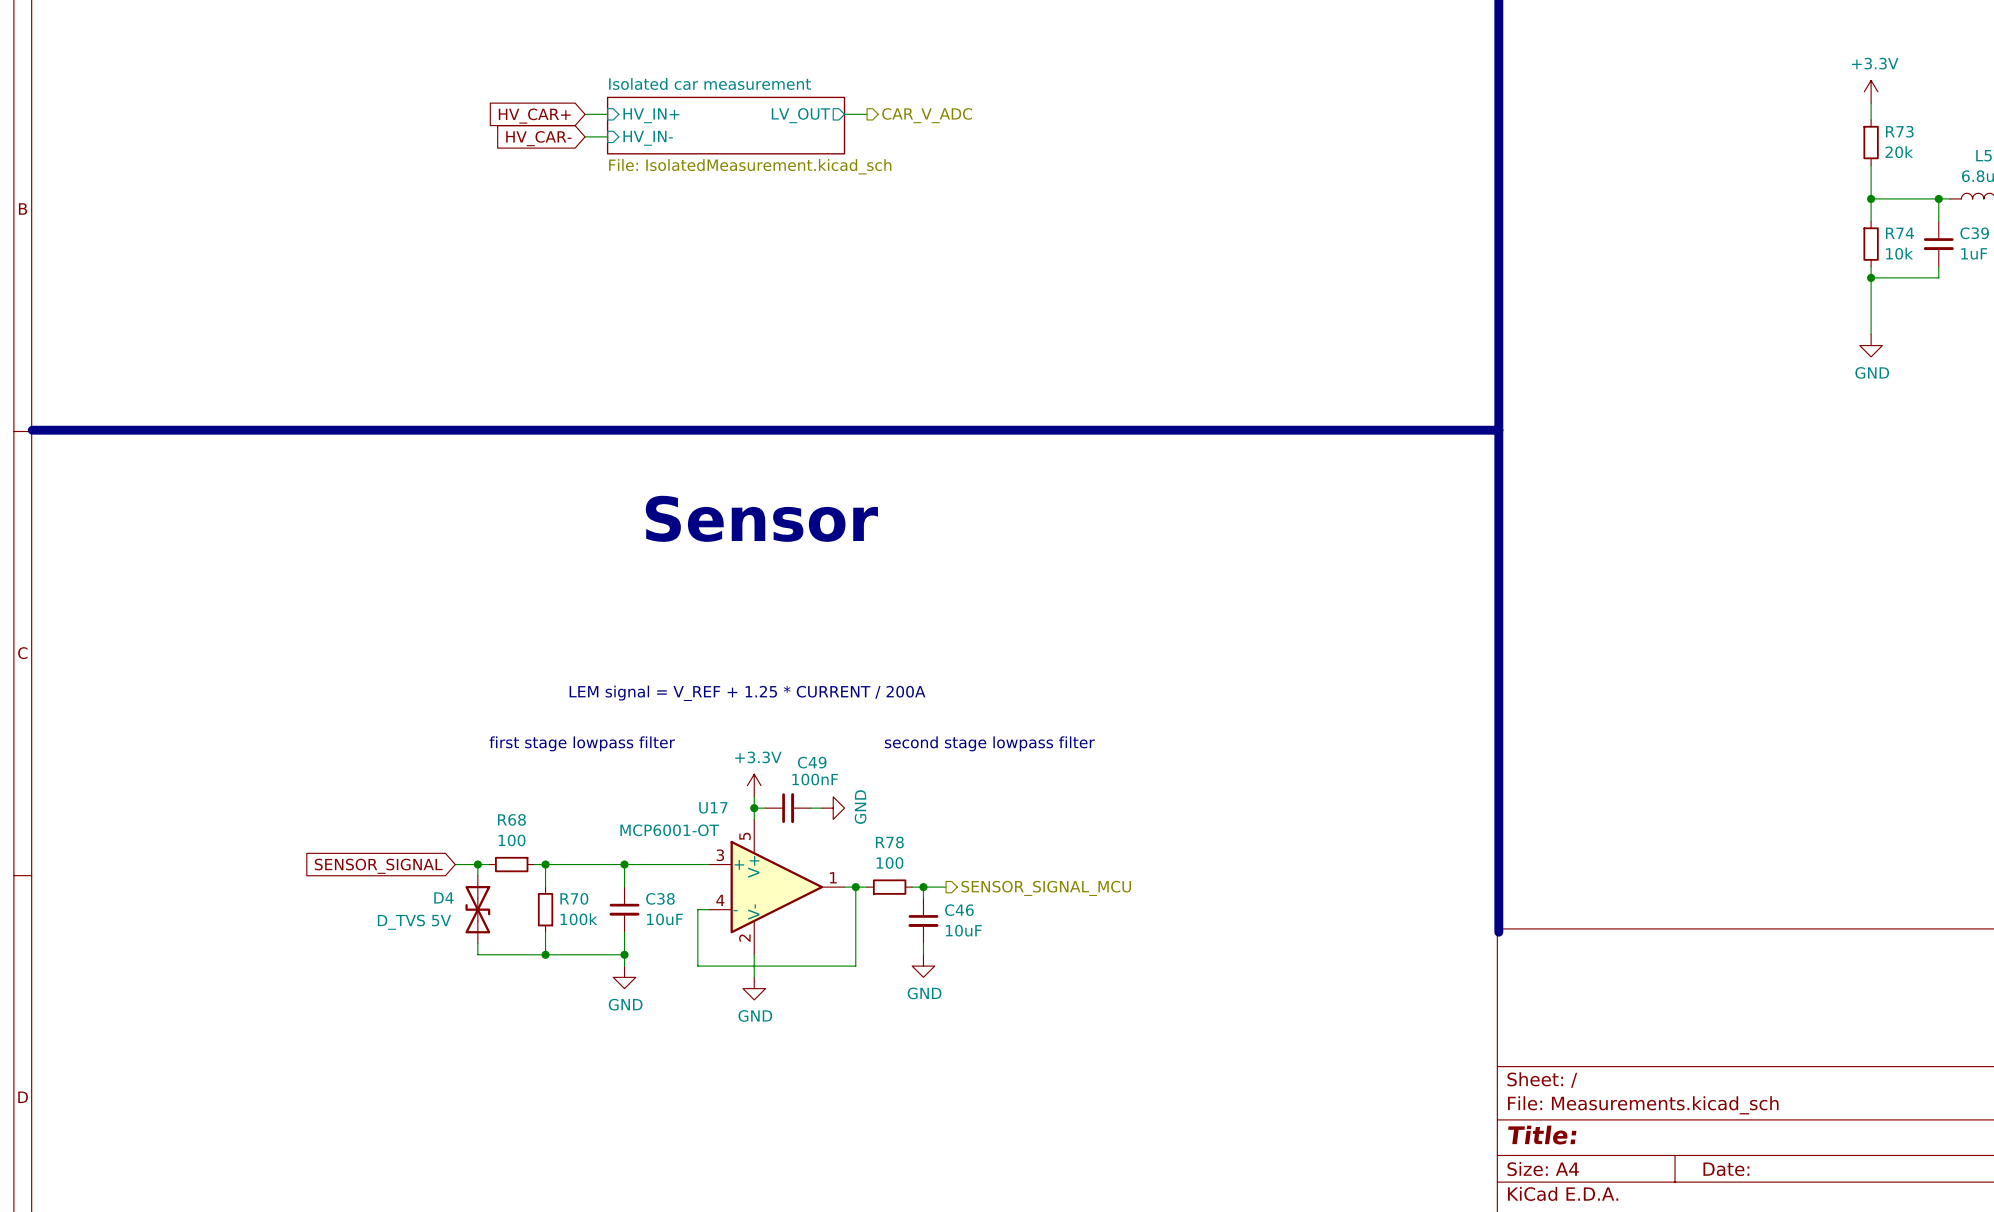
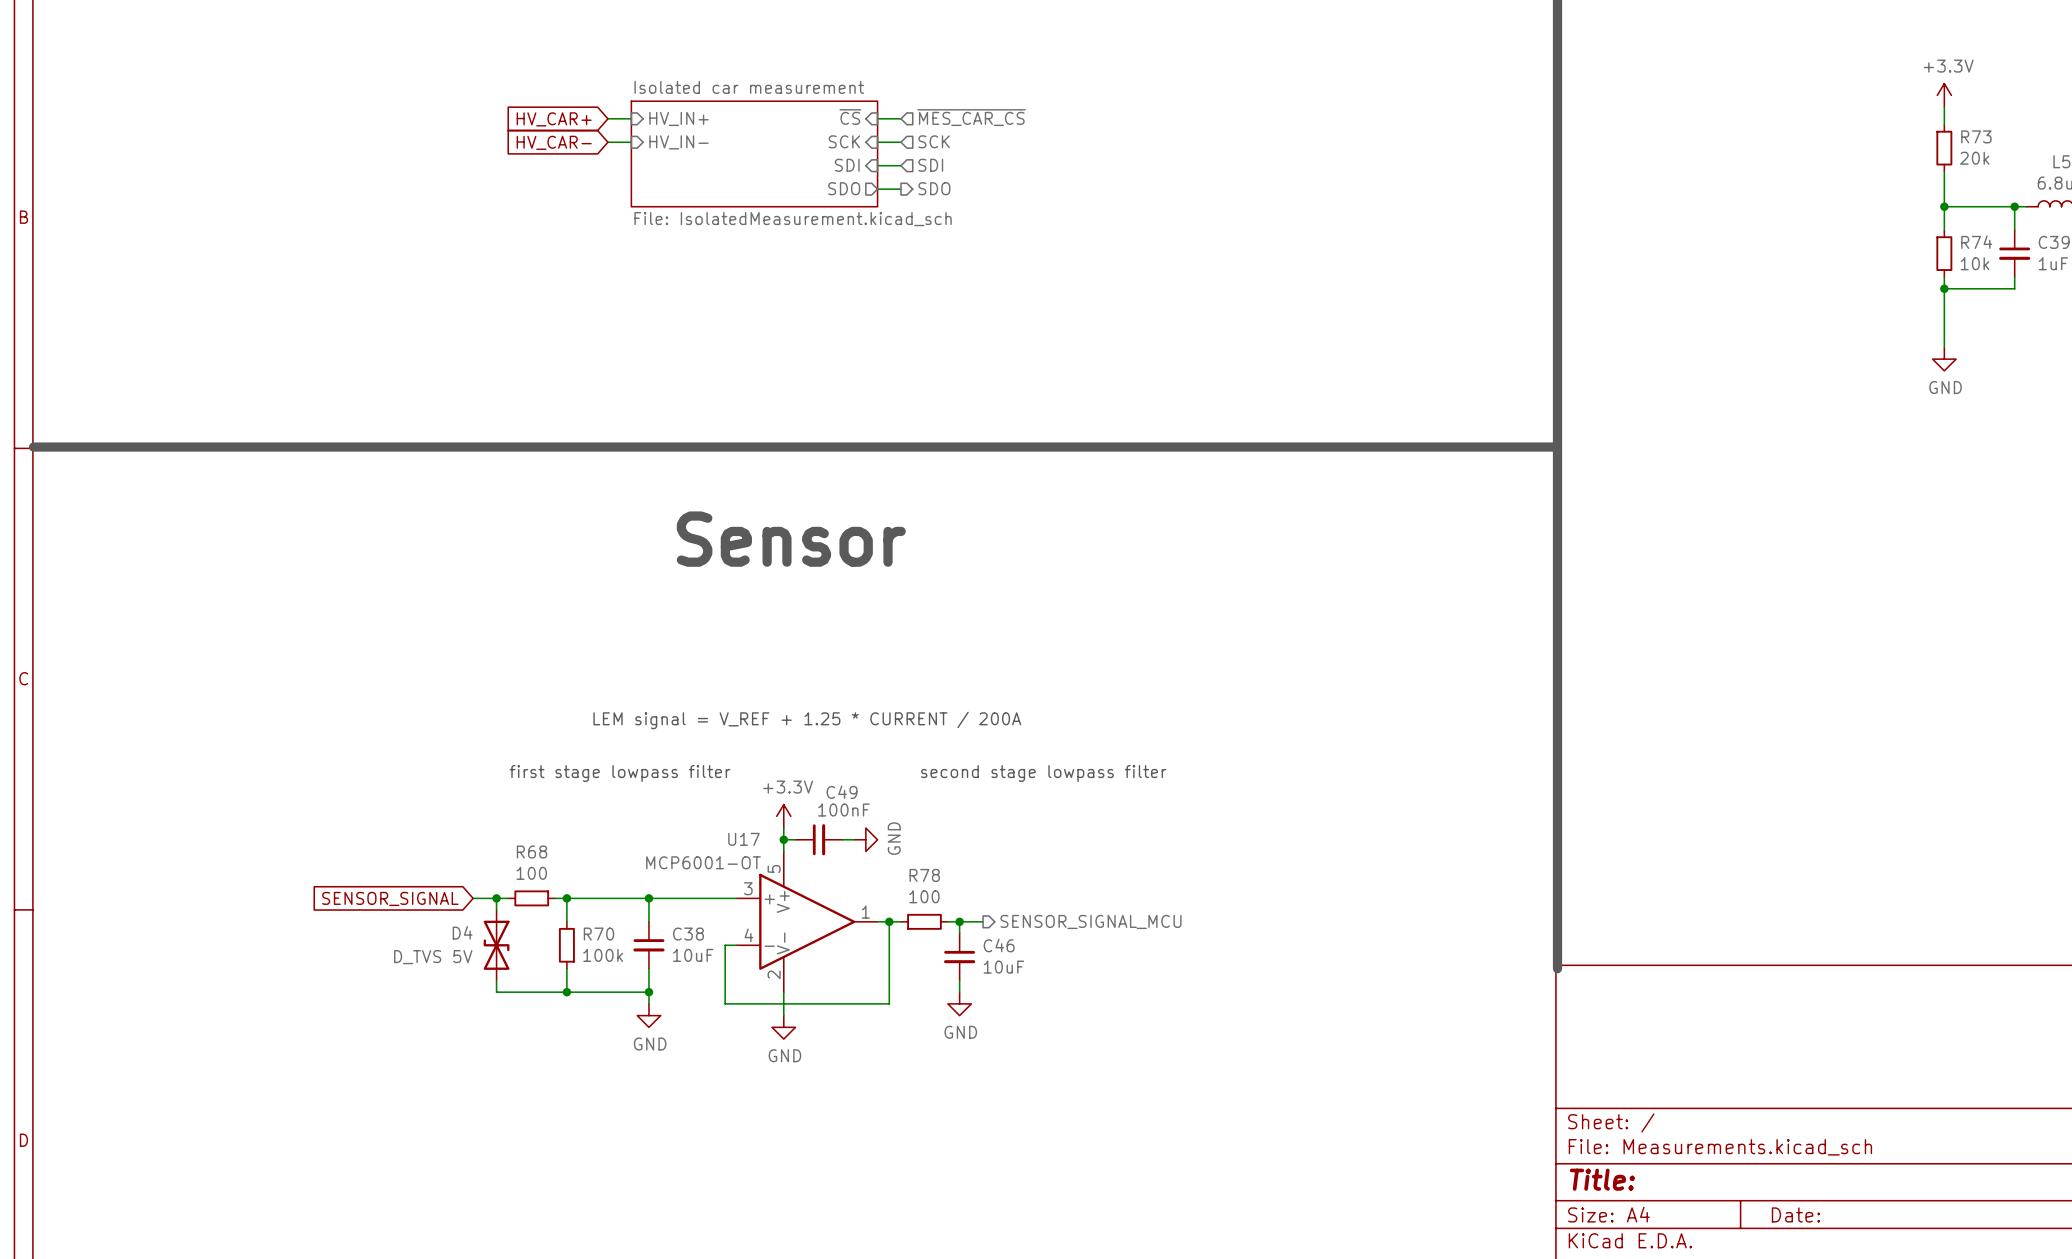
sheet pin shape: output (801, 115) -> input (850, 117)
sheet pin: LV_OUT (801, 115) -> ~{CS} (850, 117)
hierarchical label shape: output (927, 115) -> input (971, 117)
hierarchical label: CAR_V_ADC (927, 115) -> ~{MES_CAR_CS} (971, 117)
sheet Isolated car measurement: File: IsolatedMeasurement.kicad_sch (726, 125) -> none
sheet pin: none -> SCK (844, 141)
wire: none -> (877, 142) (901, 142)
hierarchical label: none -> SCK (934, 141)
sheet Isolated car measurement: none -> File: IsolatedMeasurement.kicad_sch (754, 153)
sheet pin: none -> SDI (847, 165)
wire: none -> (877, 165) (901, 165)
hierarchical label: none -> SDI (930, 165)
sheet pin: none -> SDO (844, 188)
hierarchical label: none -> SDO (934, 188)
wire: none -> (877, 189) (901, 189)

